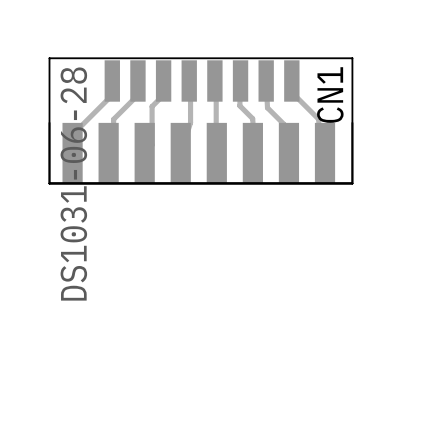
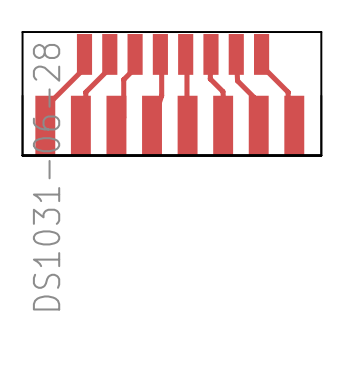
CN1 name: CN1 (330, 95) -> none

